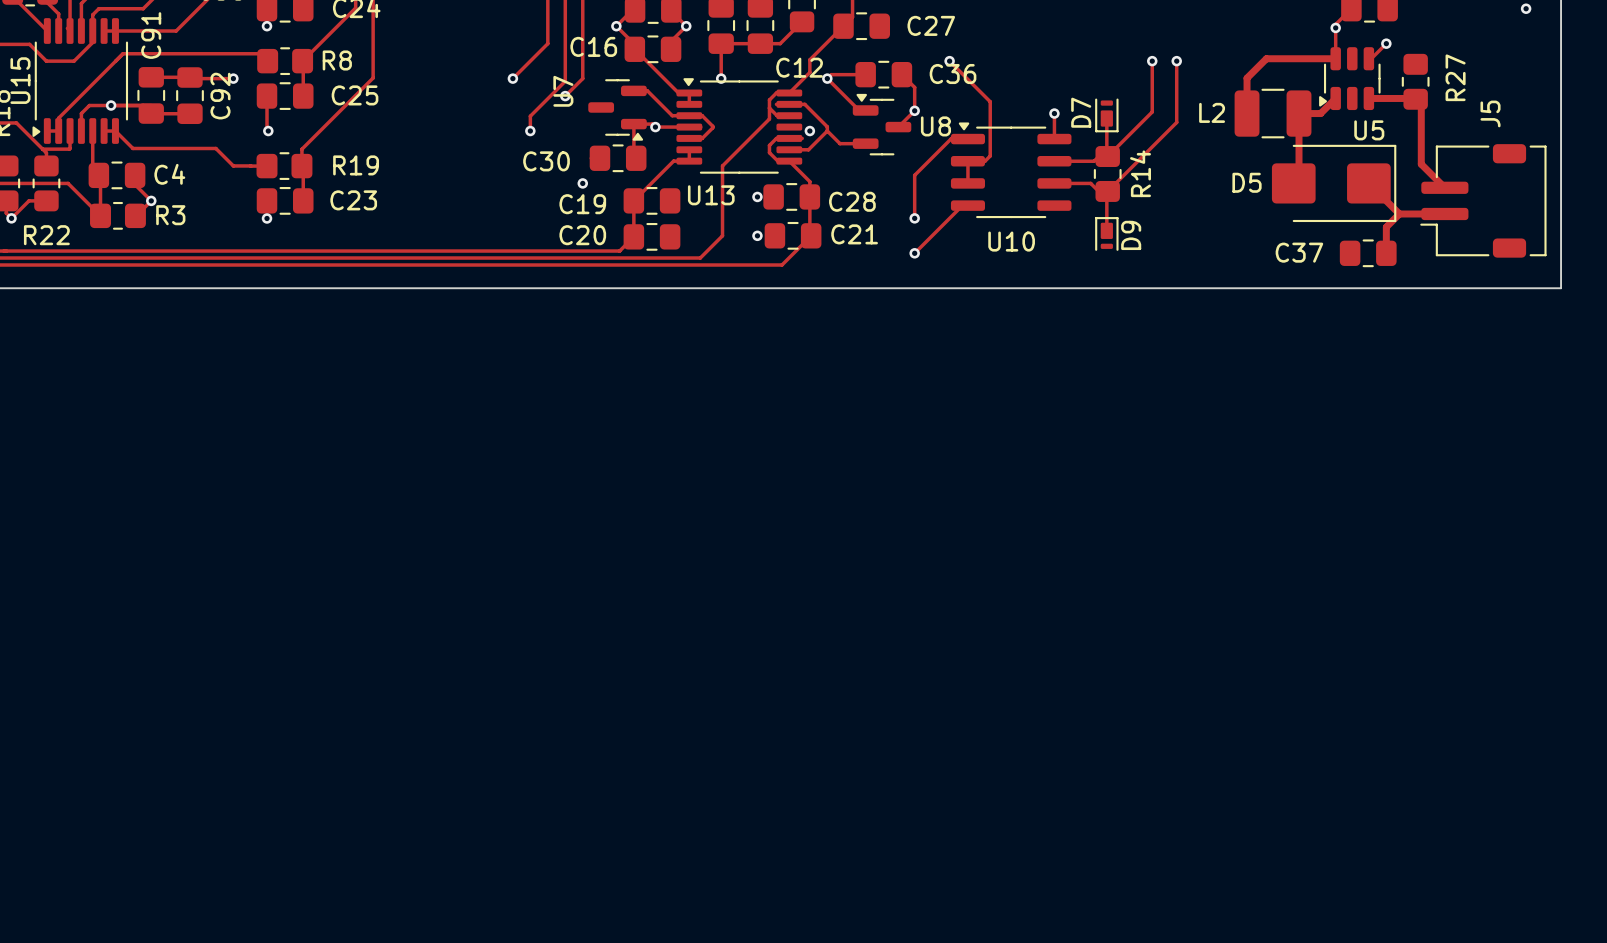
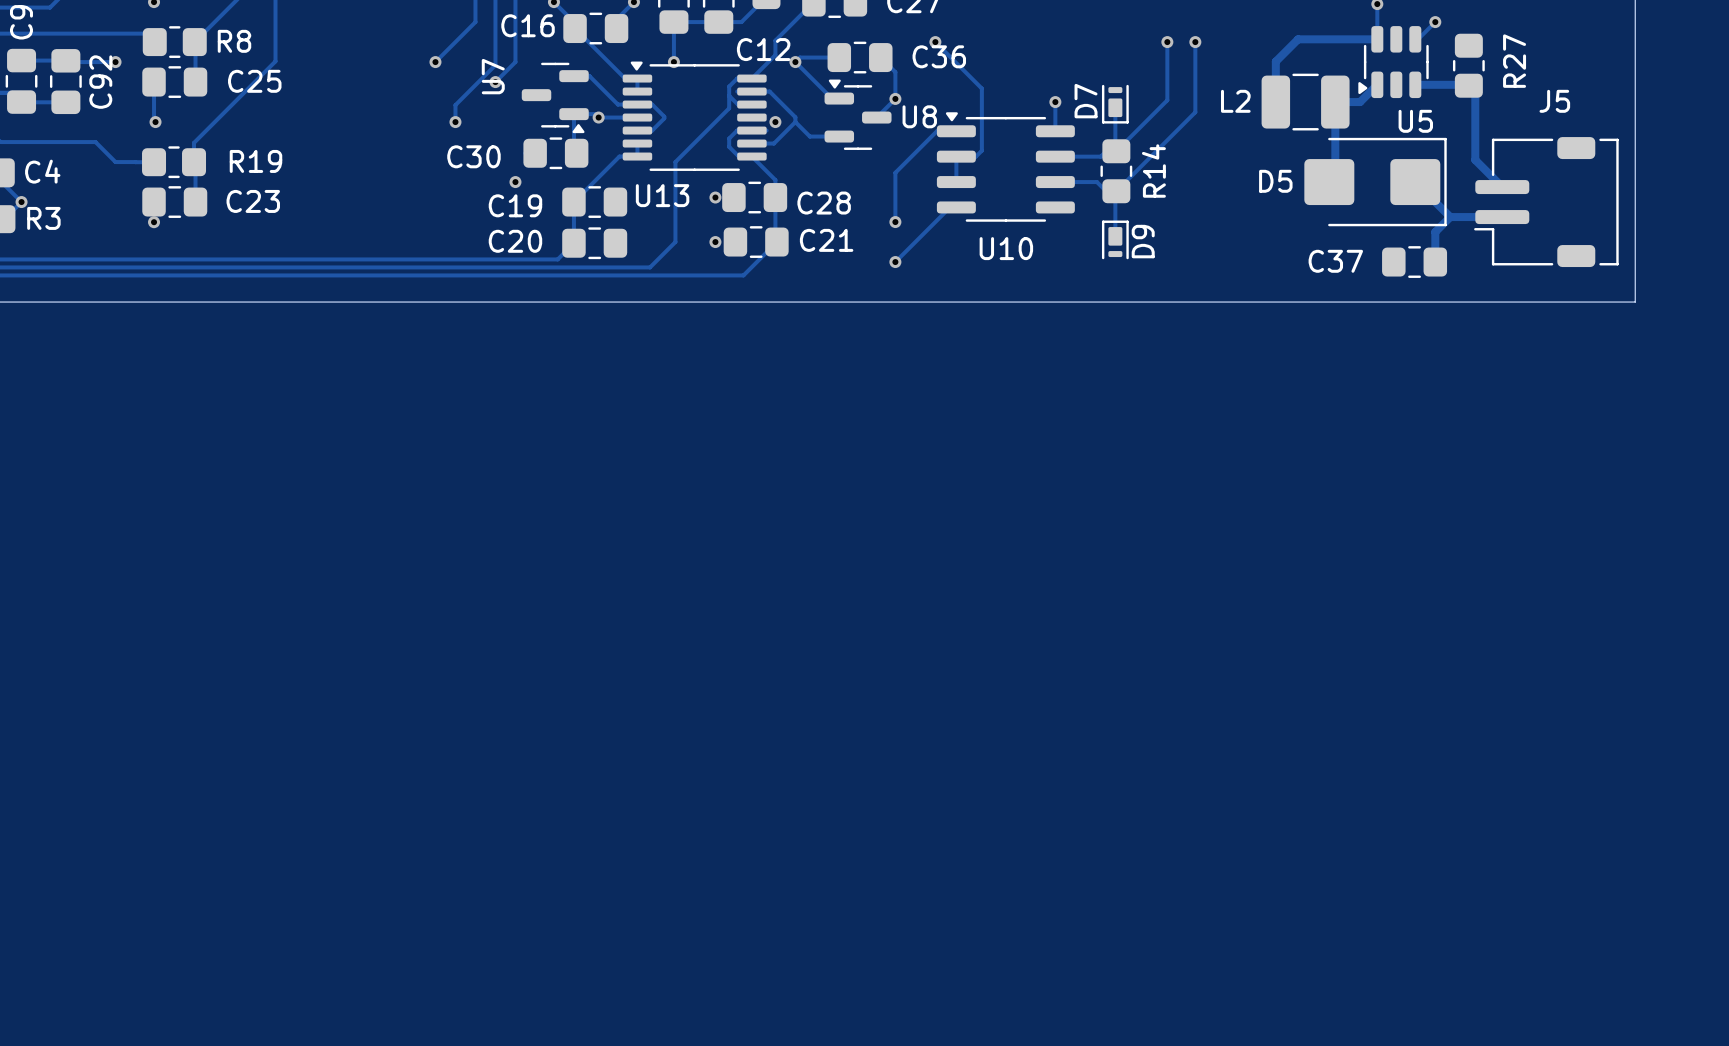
J5 name rotation: 0° (1490, 113) -> 90° clockwise (1554, 101)

